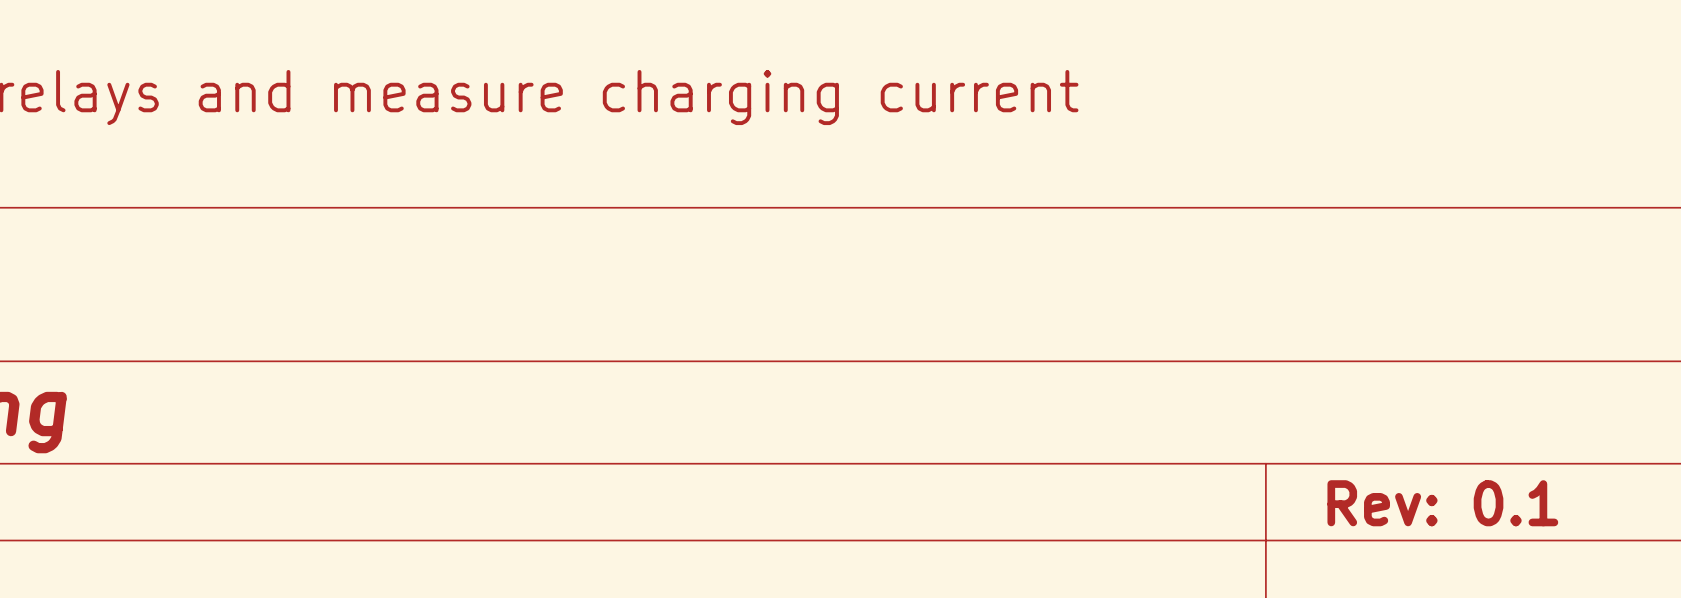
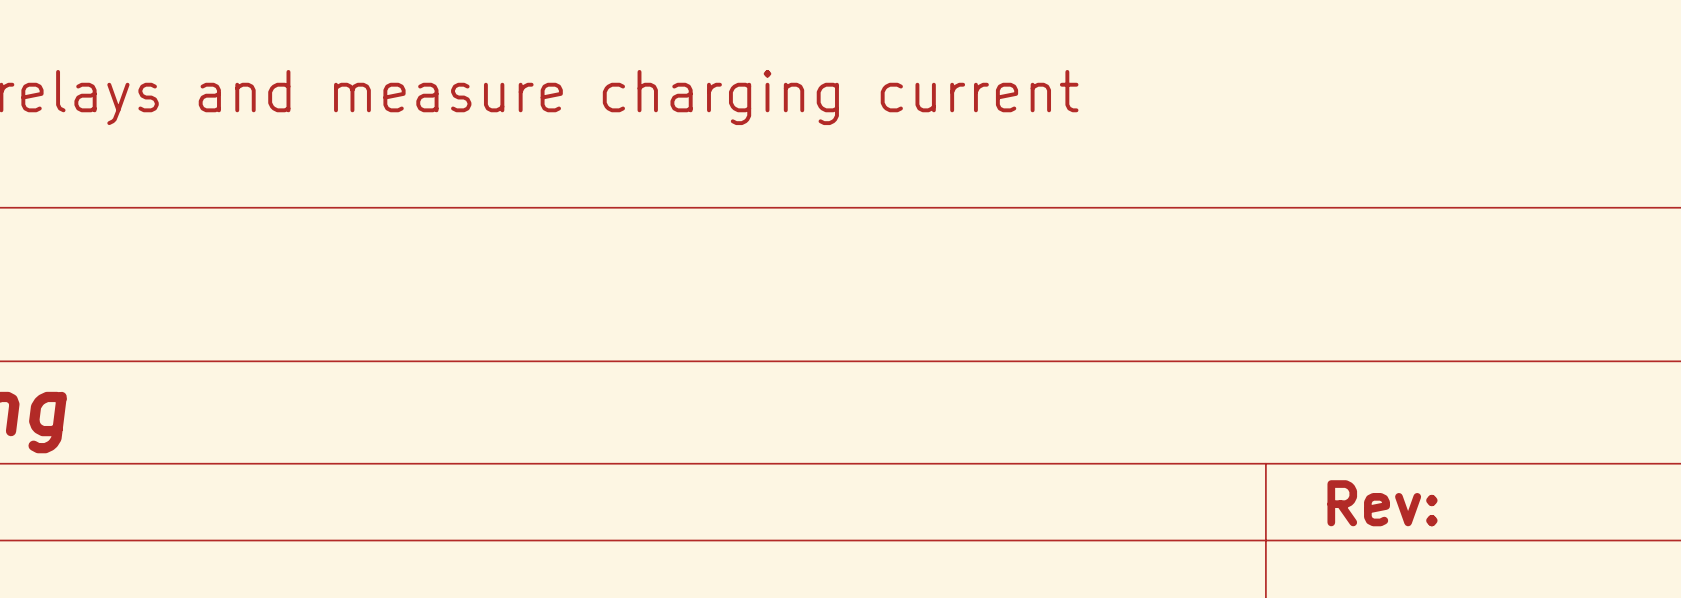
title block: Rev: 0.1 (1442, 503) -> Rev: (1382, 503)

